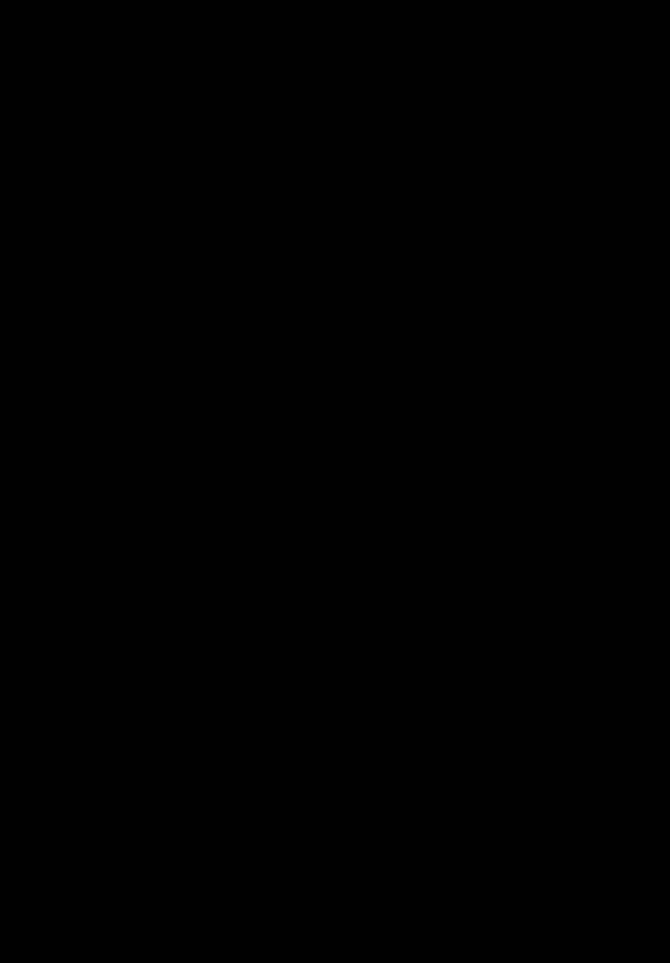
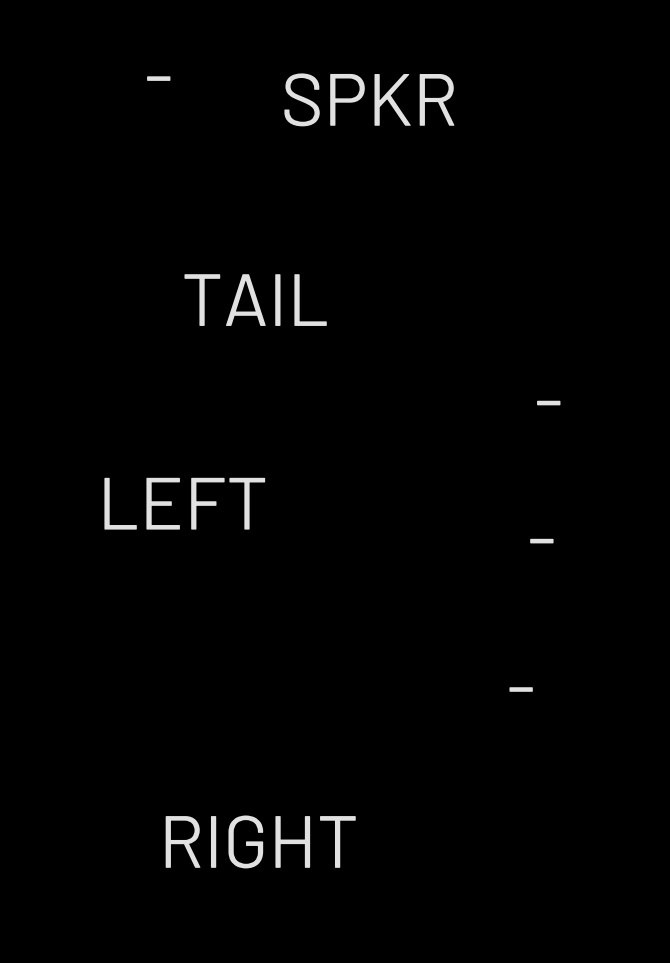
text: none -> - (158, 78)
text: none -> SPKR (369, 99)
text: none -> TAIL (255, 300)
text: none -> - (548, 403)
text: none -> LEFT (184, 503)
text: none -> - (541, 541)
text: none -> - (521, 689)
text: none -> RIGHT (260, 841)

